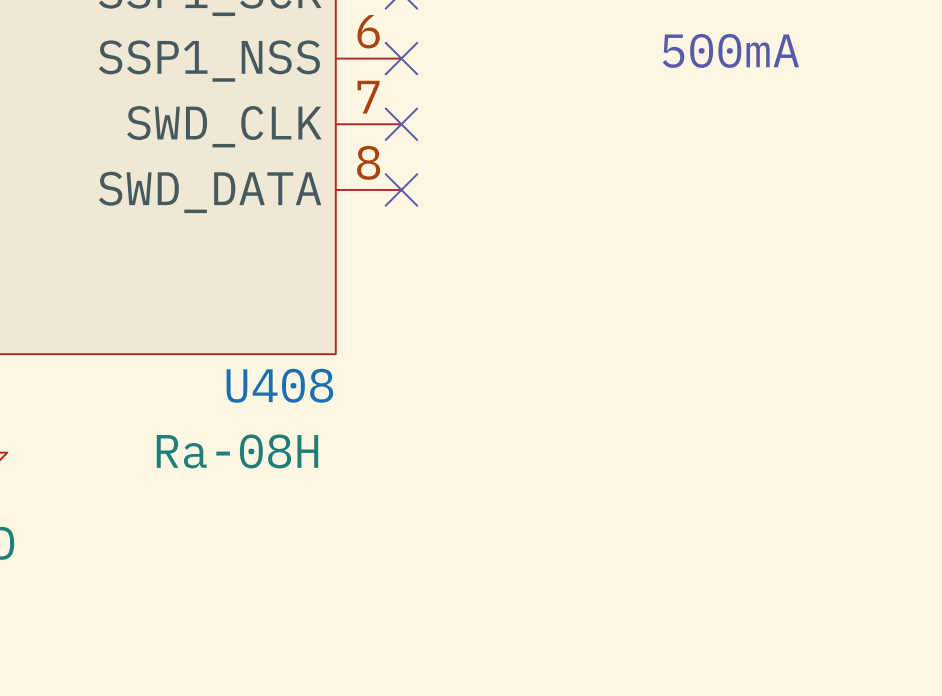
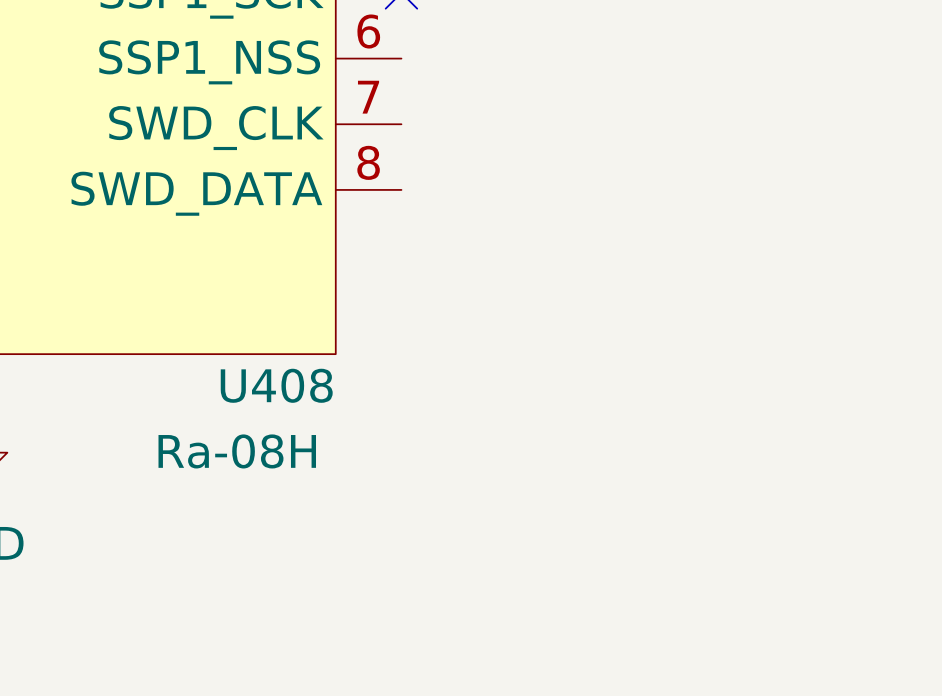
text: 500mA (730, 50) -> none
no-connect mark: (401, 58) -> none
no-connect mark: (401, 124) -> none
no-connect mark: (401, 189) -> none

